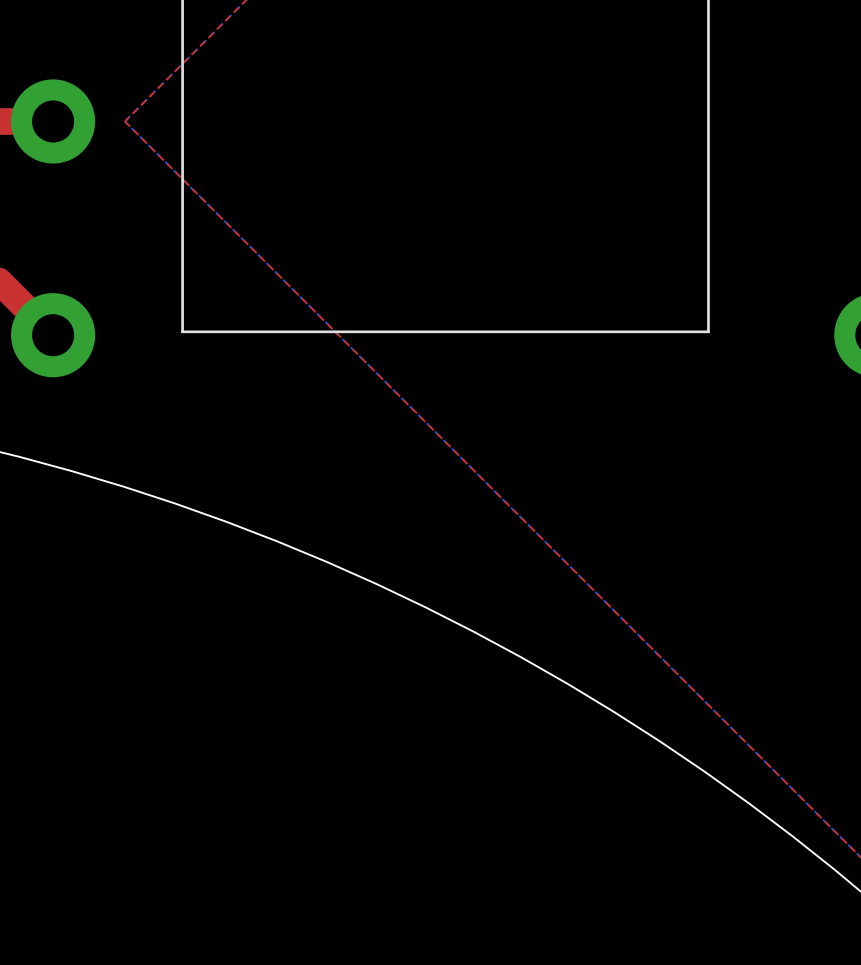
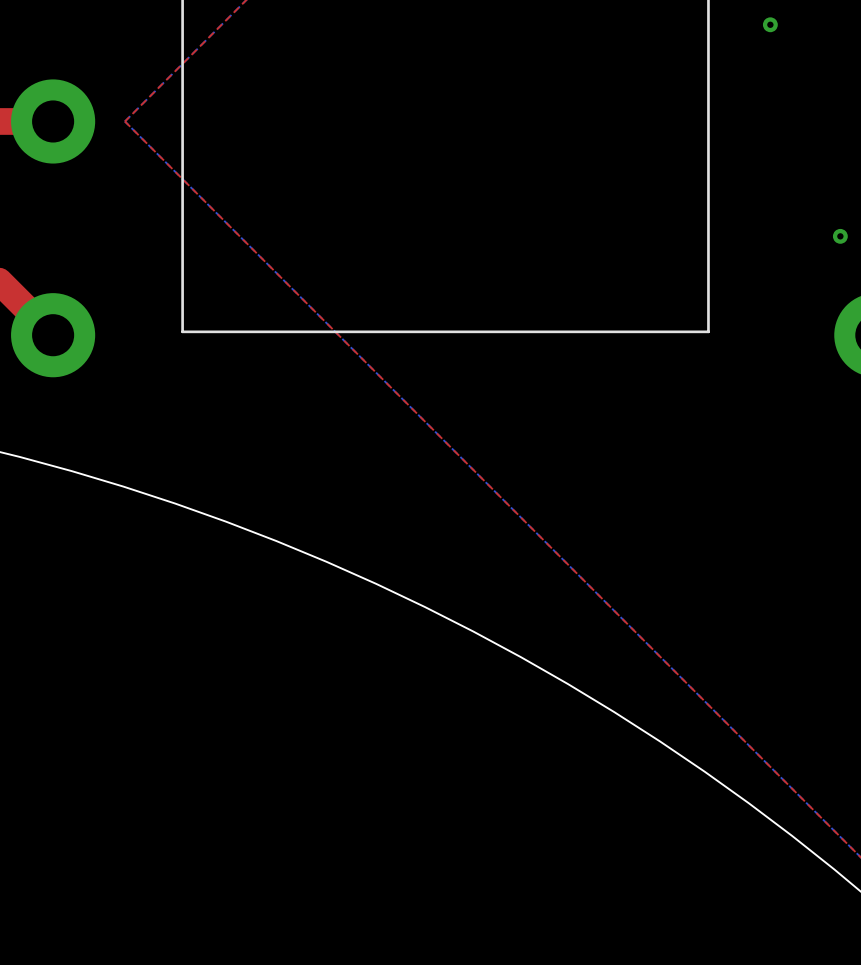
via: none -> (770, 24)
via: none -> (840, 236)

